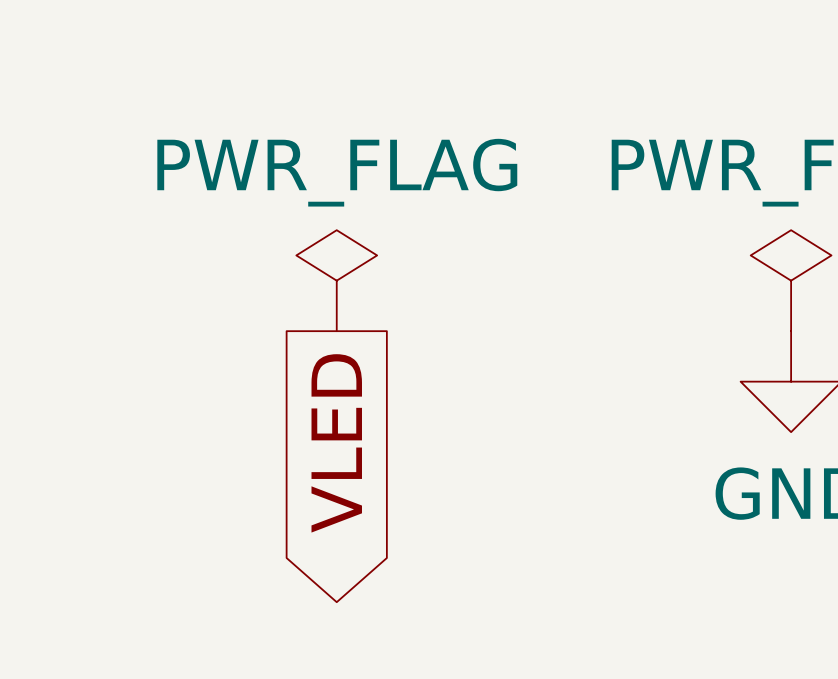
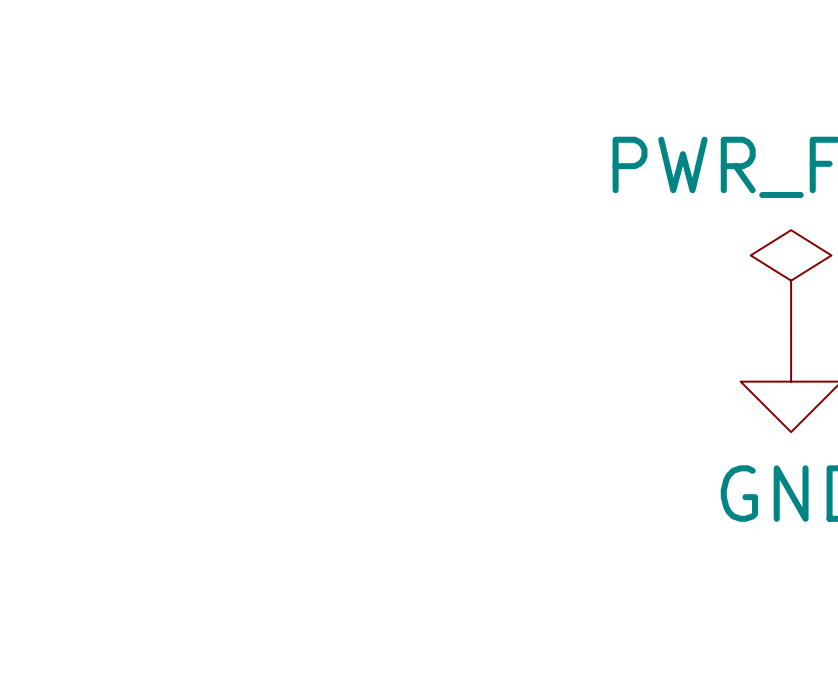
power symbol: PWR_FLAG (336, 280) -> none
global label: VLED (336, 443) -> none

